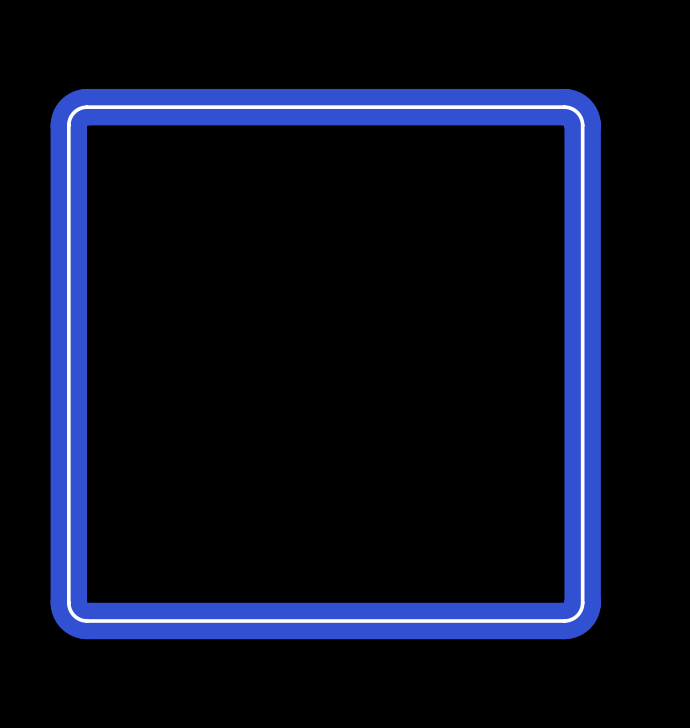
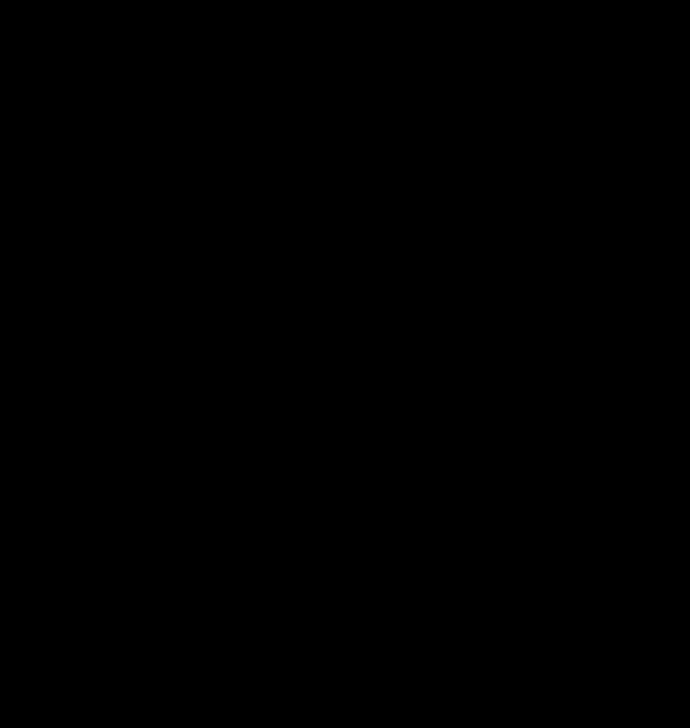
drawing: [50, 88, 601, 640] -> none

